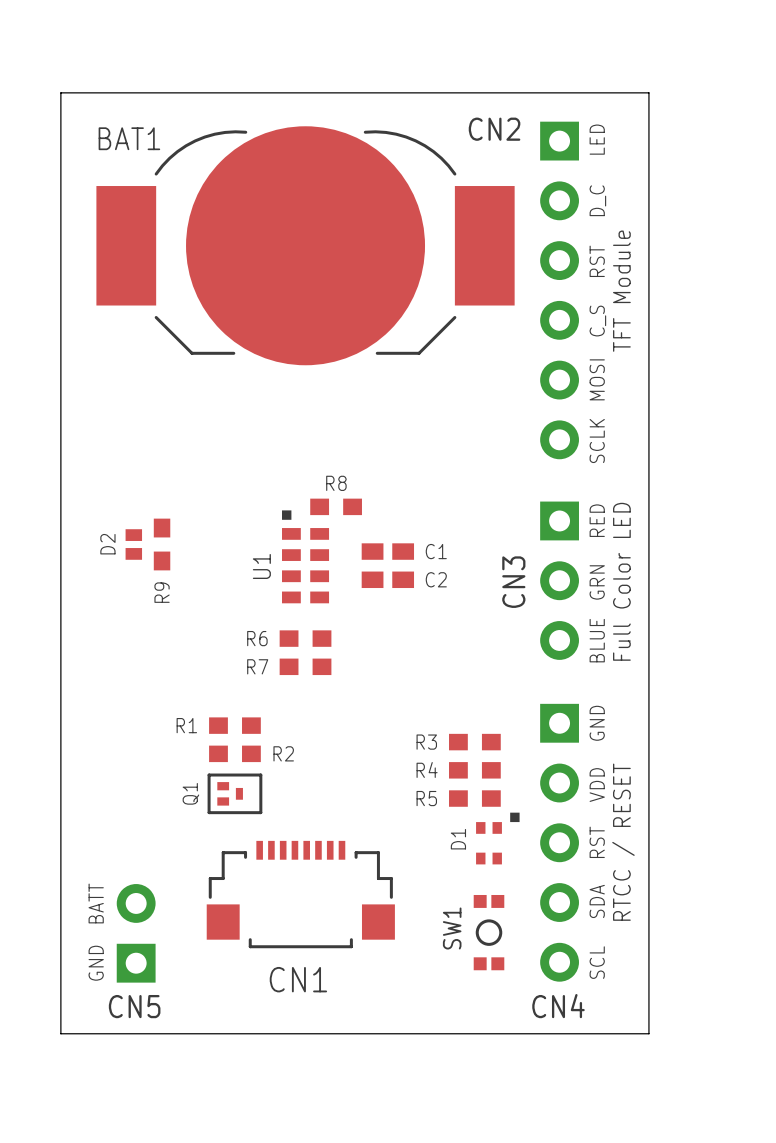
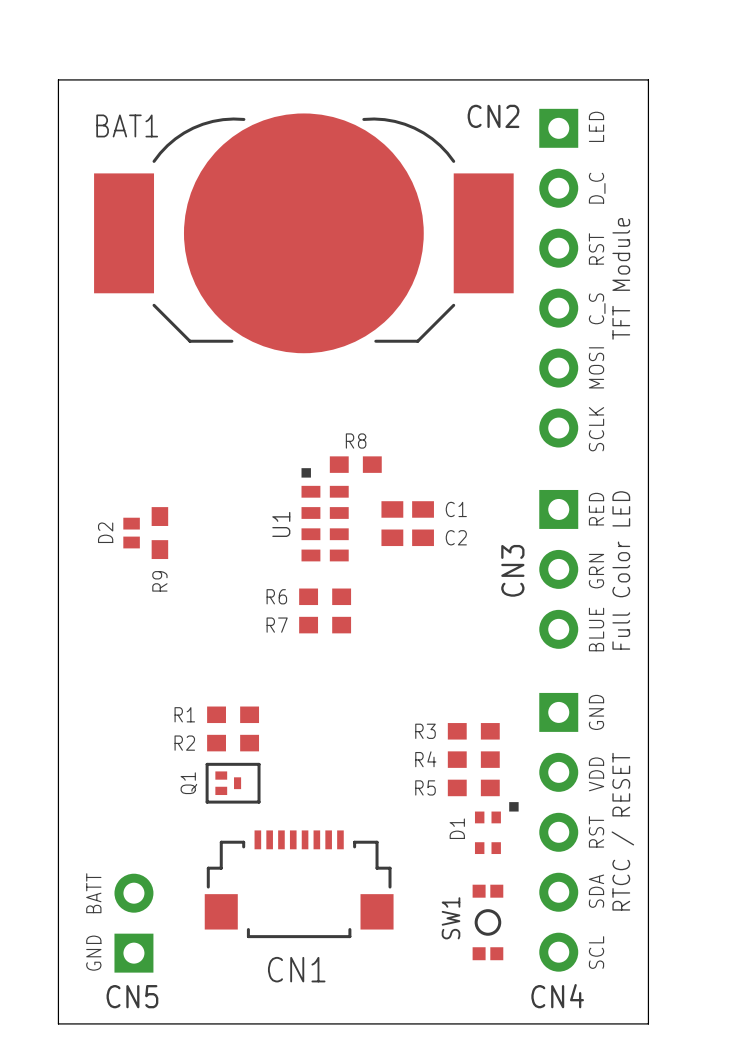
R8 position: (336, 506) -> (355, 464)
C1 position: (387, 551) -> (407, 509)
U1 position: (305, 556) -> (325, 514)
C2 position: (387, 579) -> (407, 537)
R6 position: (305, 638) -> (325, 596)
R7 position: (305, 666) -> (325, 625)
R2 name position: R2 (283, 753) -> R2 (184, 743)

